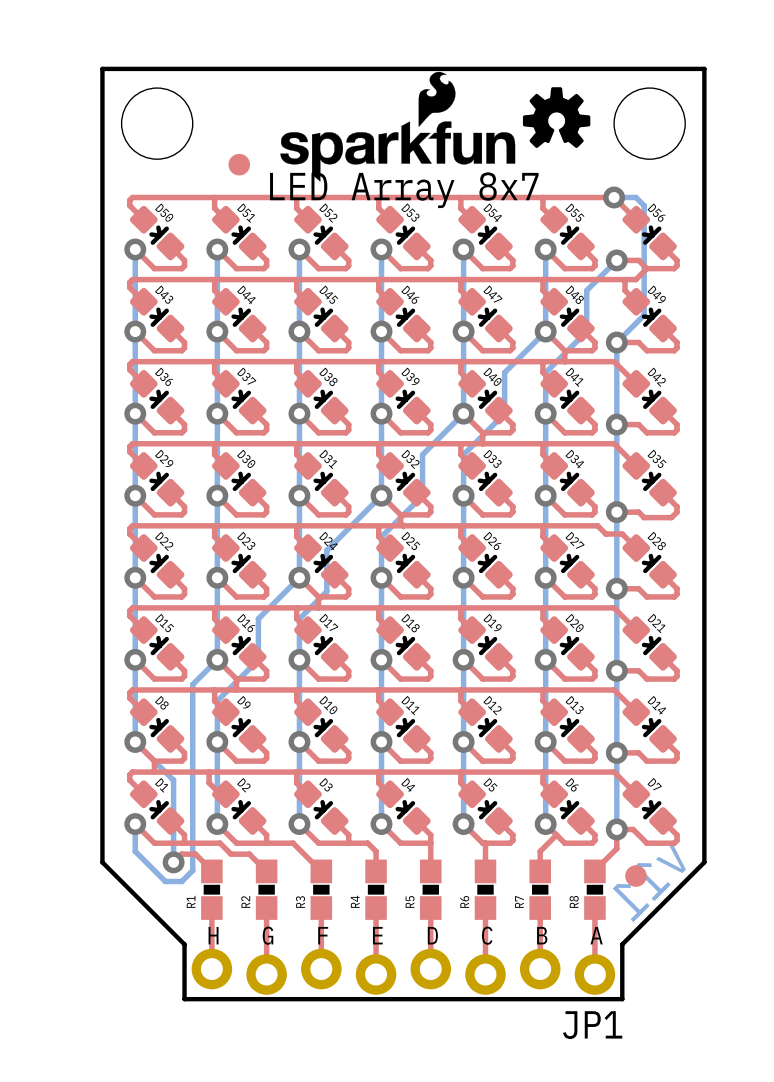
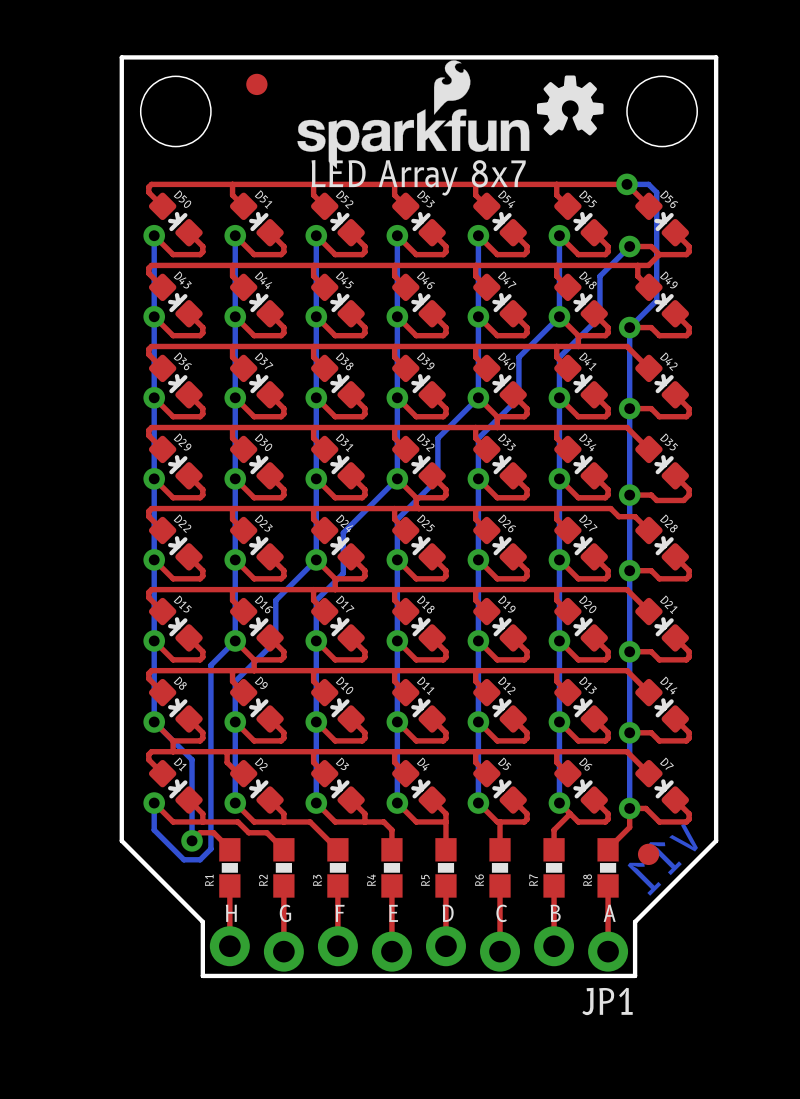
part position: (239, 164) -> (256, 84)

